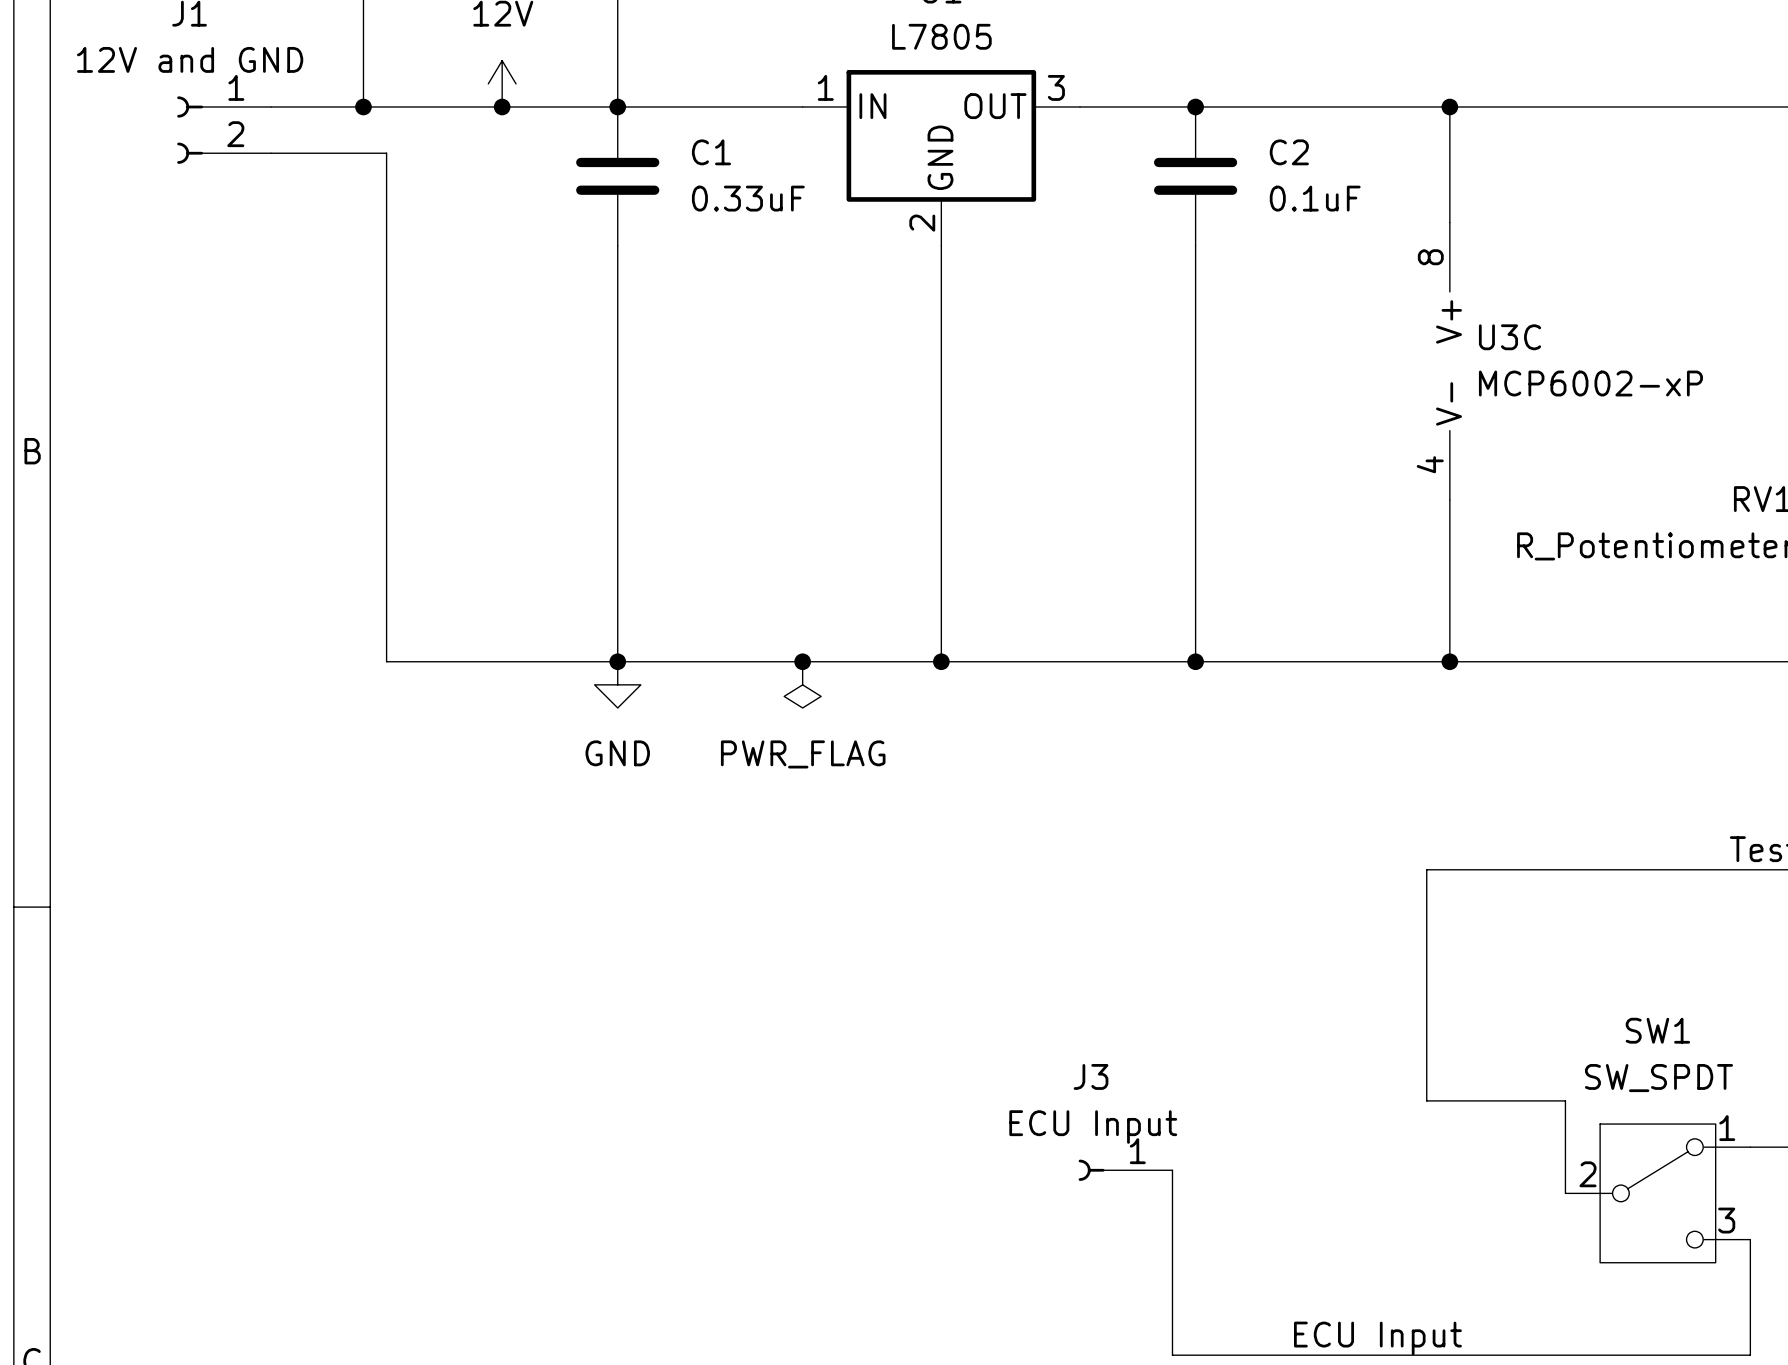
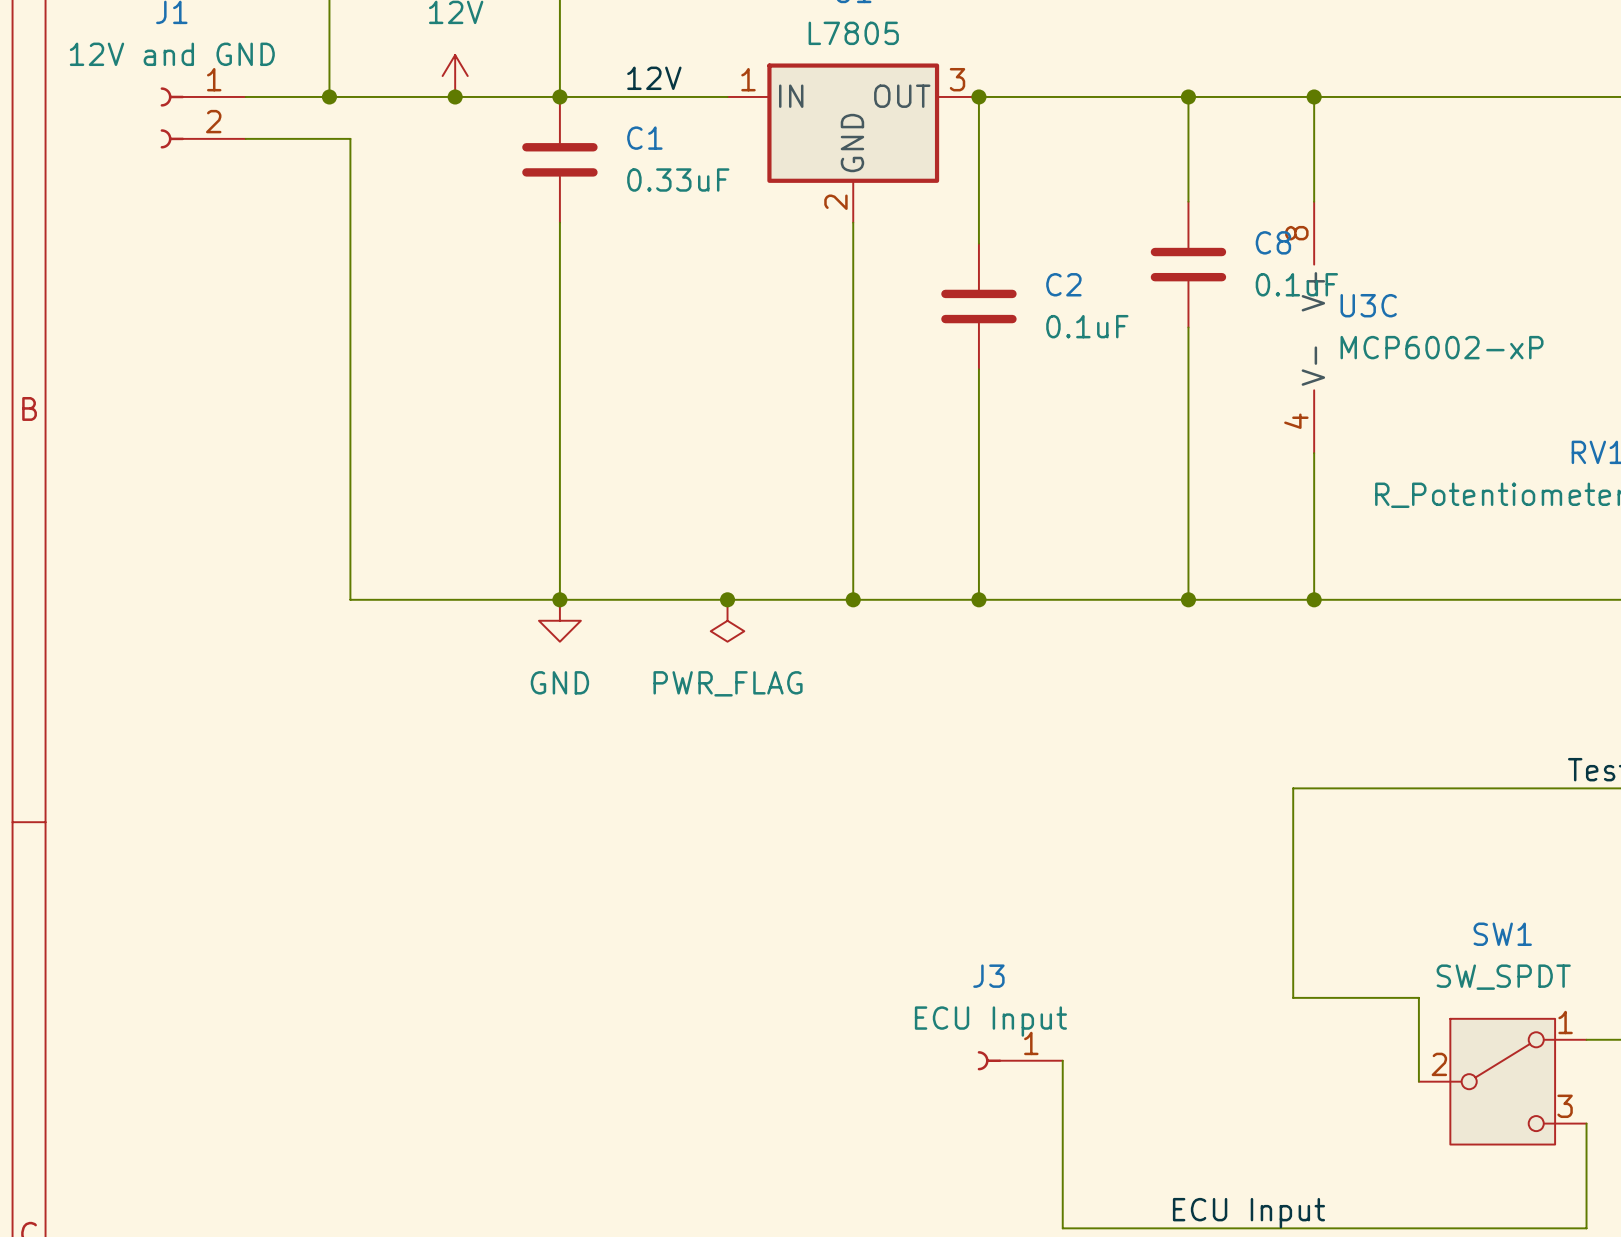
label: none -> 12V (654, 78)
wire: none -> (978, 96) (978, 243)
junction: none -> (978, 96)
junction: (1195, 107) -> none
wire: none -> (1188, 96) (1188, 201)
junction: none -> (1188, 96)
C2 position: (1195, 176) -> (978, 306)
wire: (1195, 245) (1195, 661) -> none
C8: none -> 0.1uF (1188, 264)
wire: none -> (1188, 327) (1188, 599)
wire: none -> (978, 369) (978, 599)
junction: none -> (978, 599)
junction: (1195, 661) -> none
junction: none -> (1188, 599)

